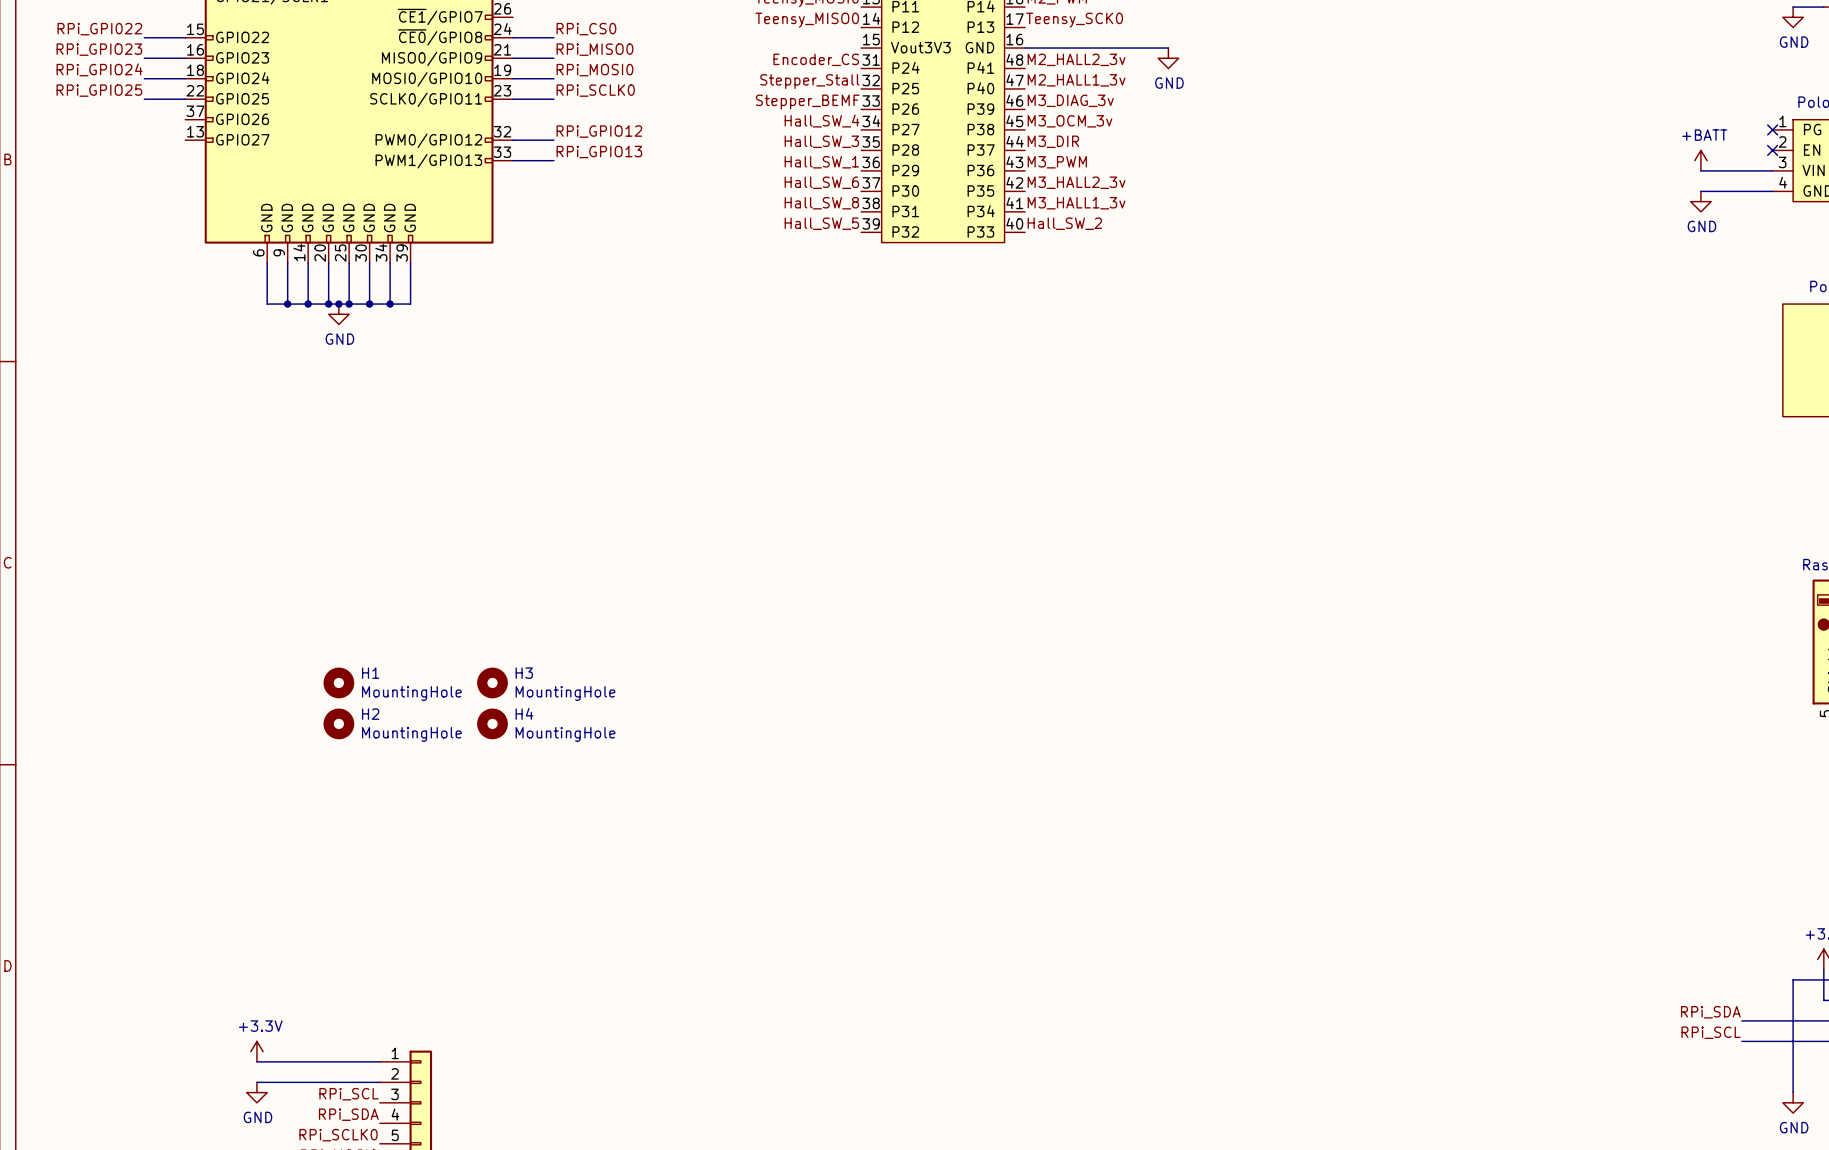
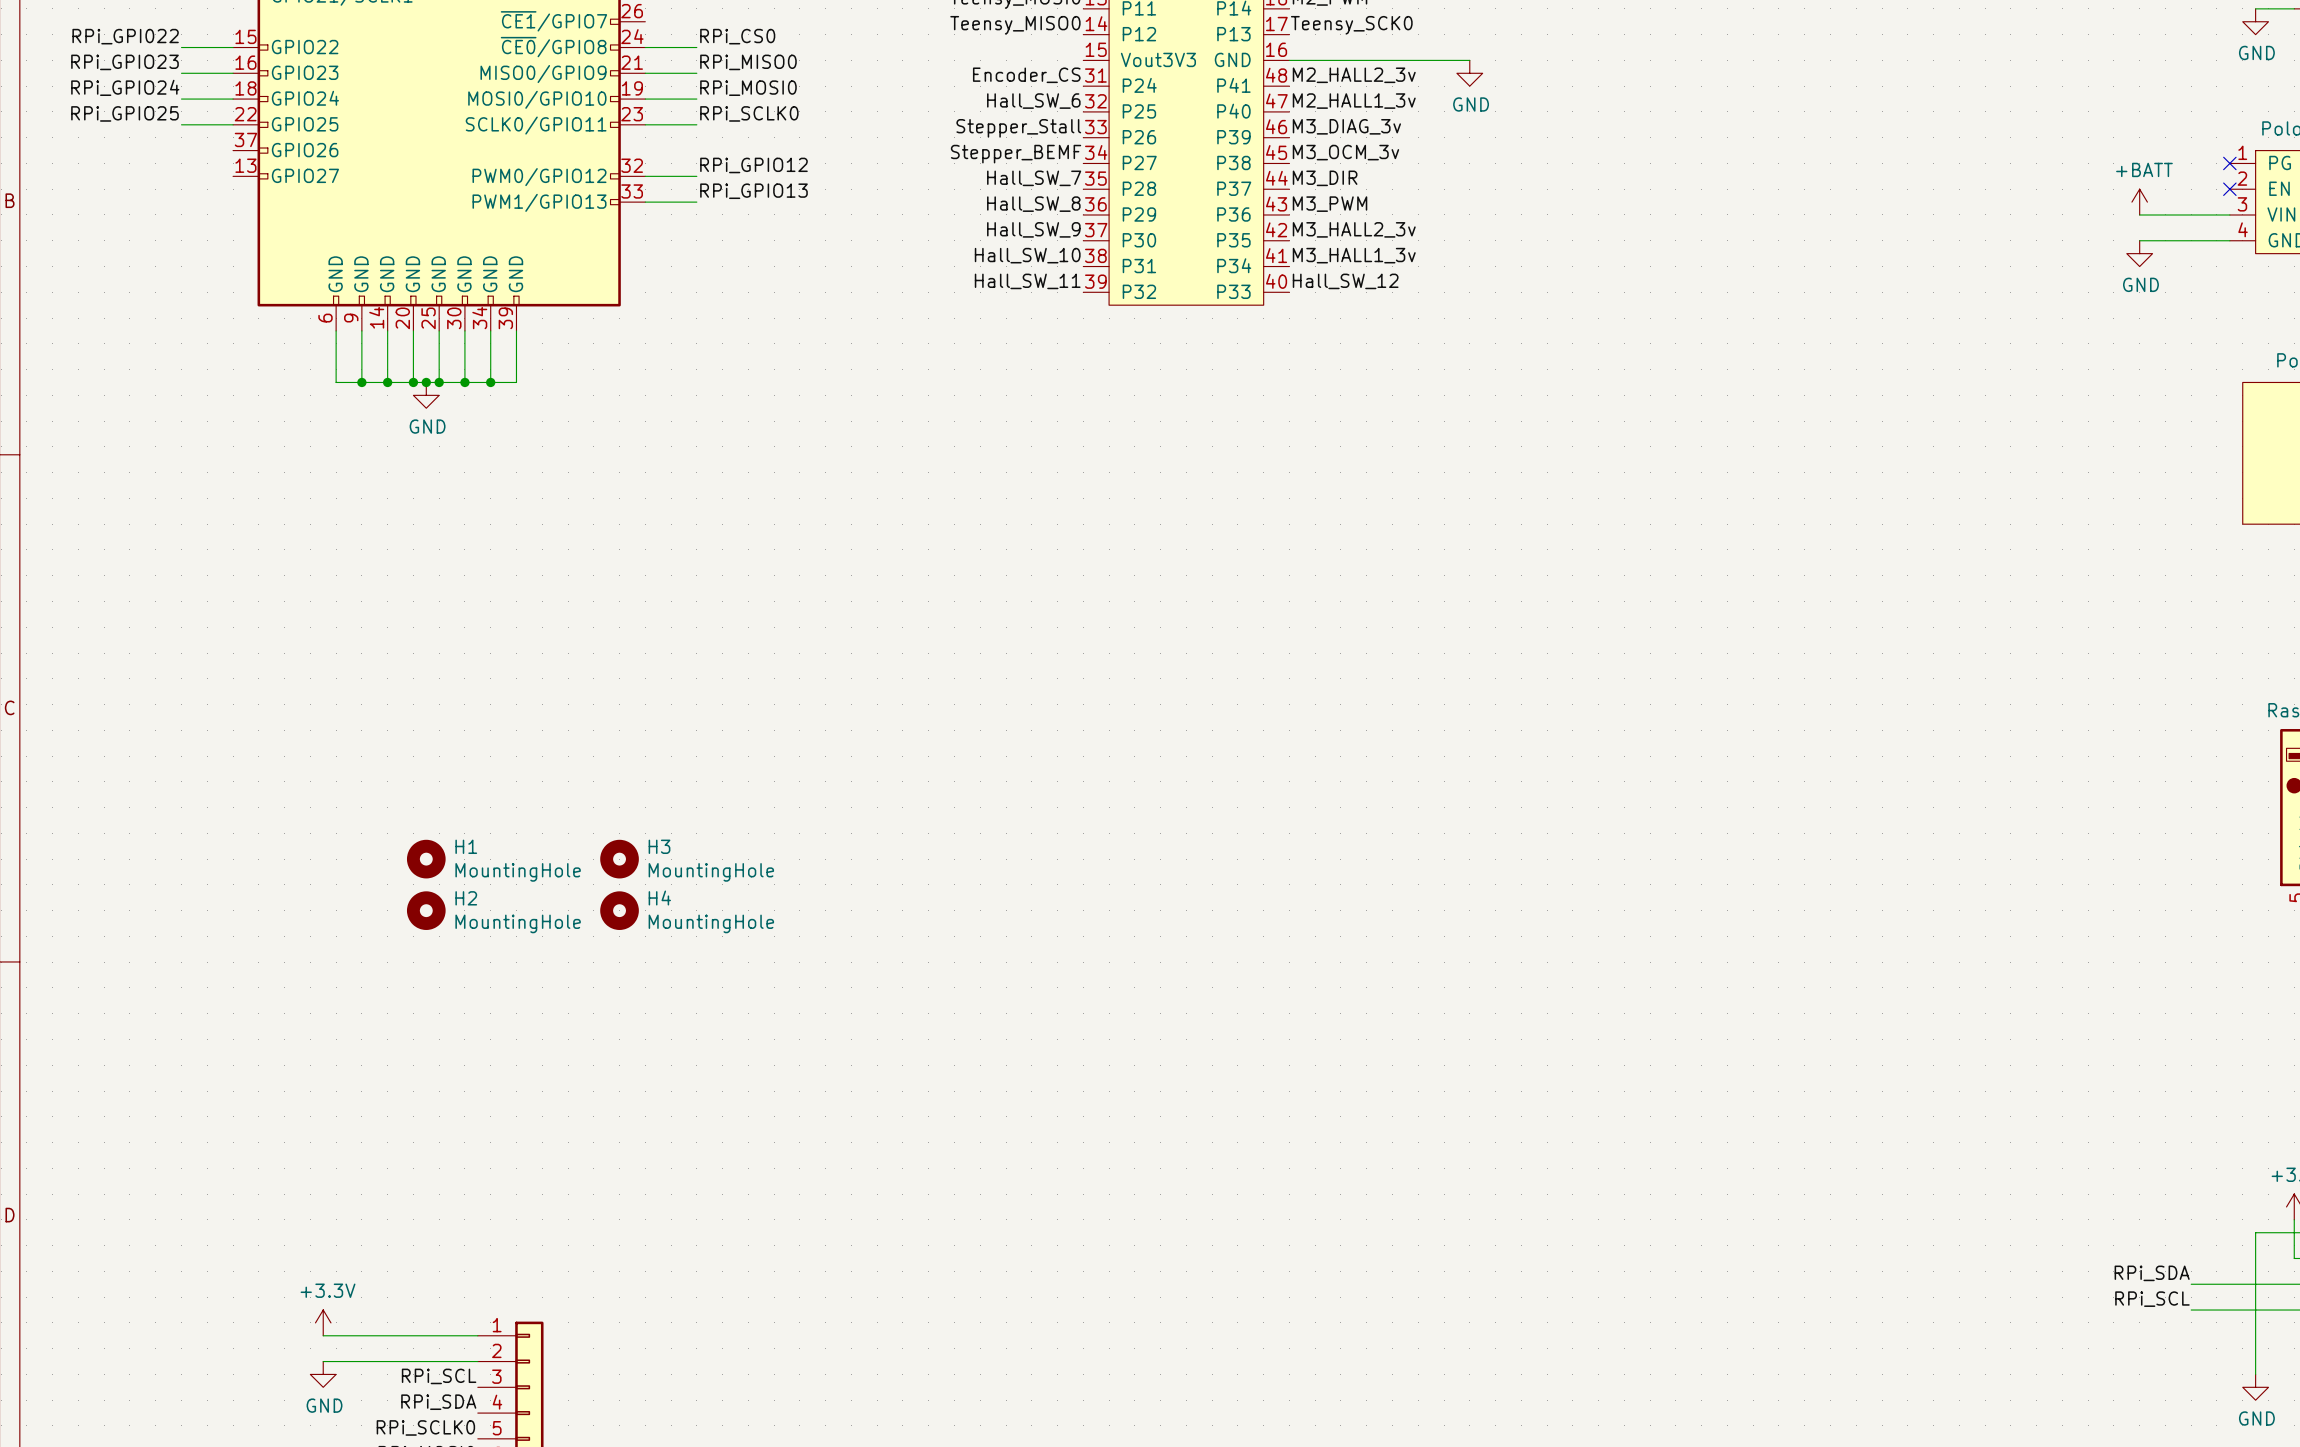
label: Stepper_Stall (809, 81) -> Hall_SW_6 (1033, 101)
label: Stepper_BEMF (807, 102) -> Stepper_Stall (1018, 128)
label: Hall_SW_4 (822, 121) -> Stepper_BEMF (1016, 154)
label: Hall_SW_3 (821, 141) -> Hall_SW_7 (1034, 178)
label: Hall_SW_1 (821, 162) -> Hall_SW_8 (1033, 204)
label: Hall_SW_6 (821, 182) -> Hall_SW_9 (1033, 229)
label: Hall_SW_8 (821, 203) -> Hall_SW_10 (1027, 255)
label: Hall_SW_5 (821, 223) -> Hall_SW_11 (1027, 281)
label: Hall_SW_2 (1064, 223) -> Hall_SW_12 (1345, 281)

